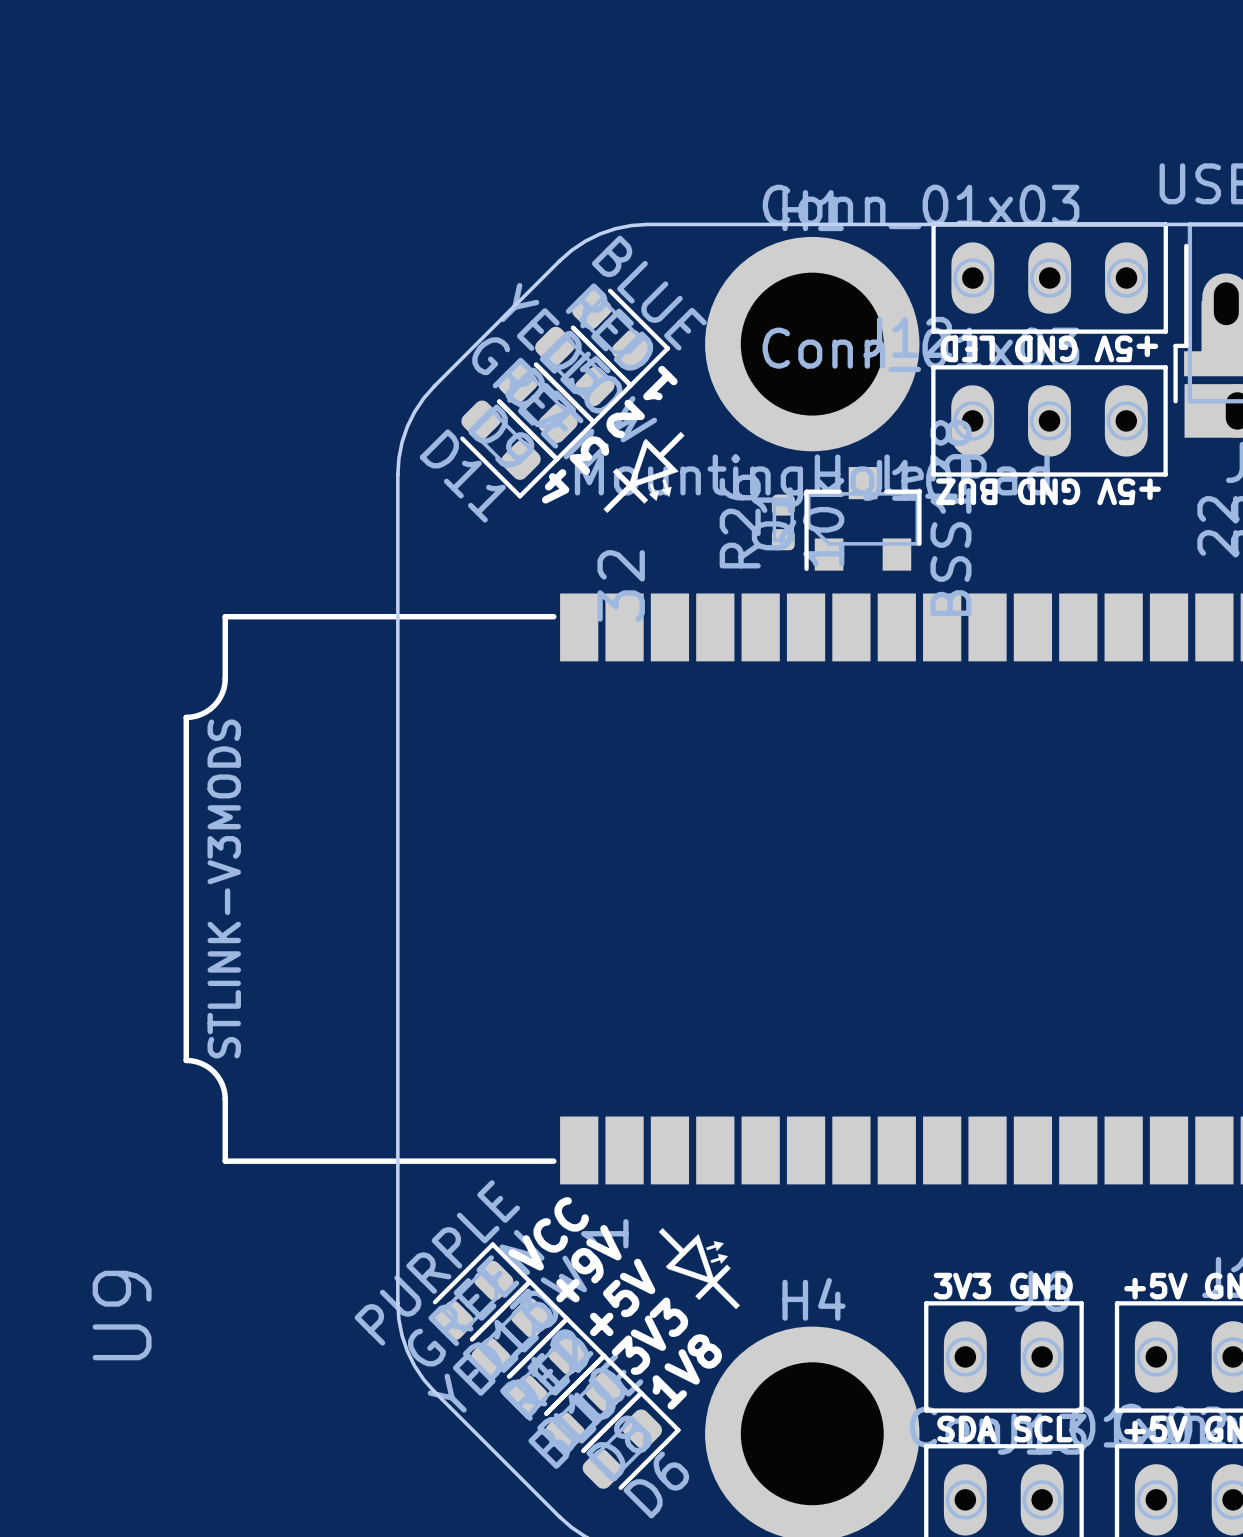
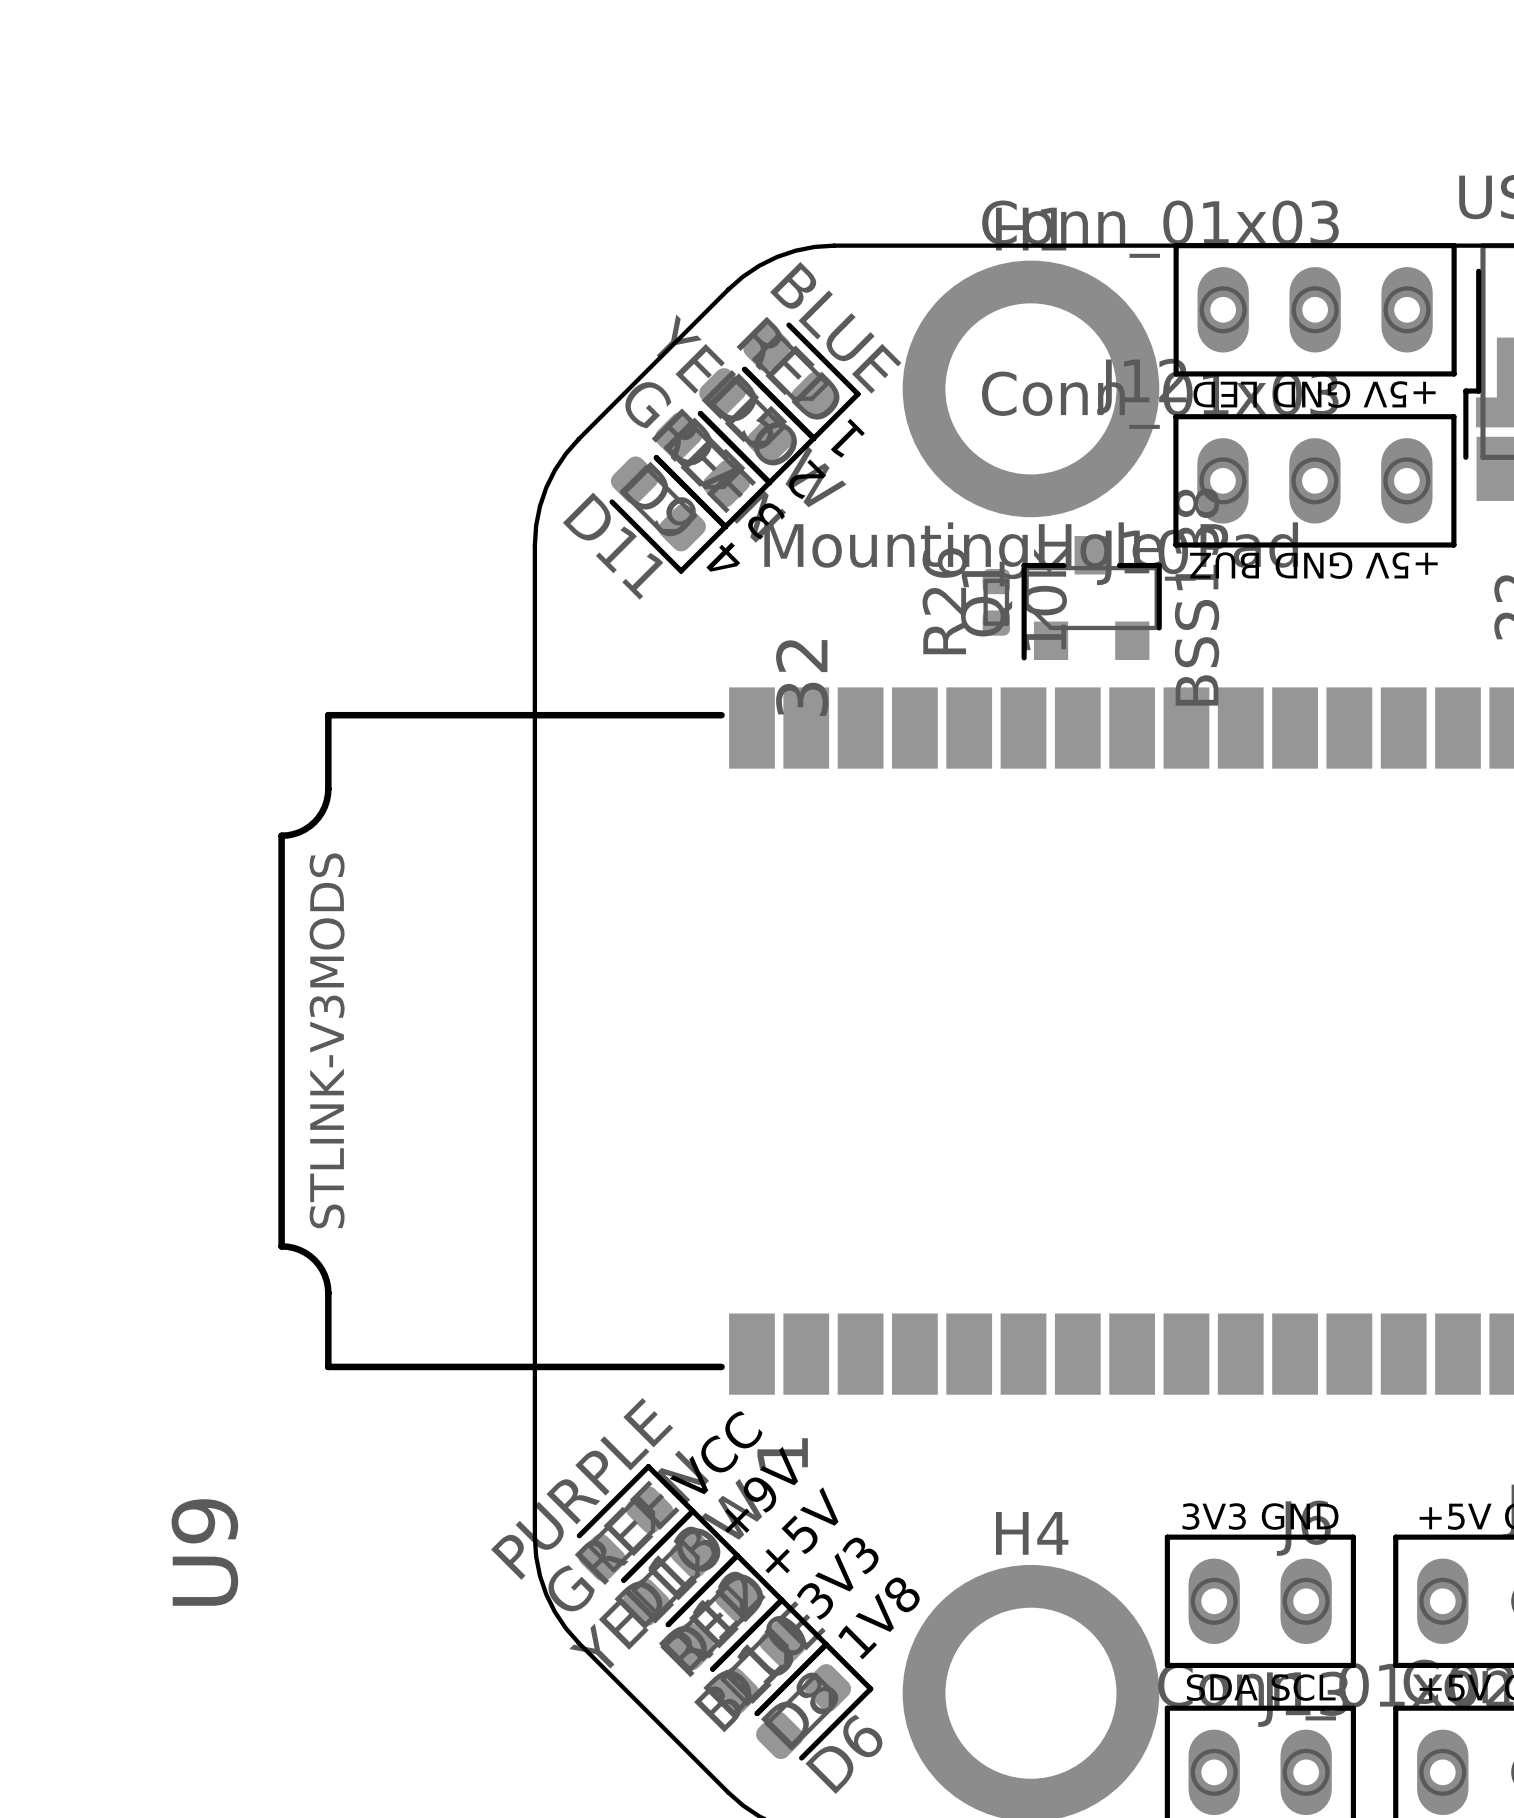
drawing: [603, 431, 685, 513] -> none
drawing: [658, 1228, 740, 1310] -> none

